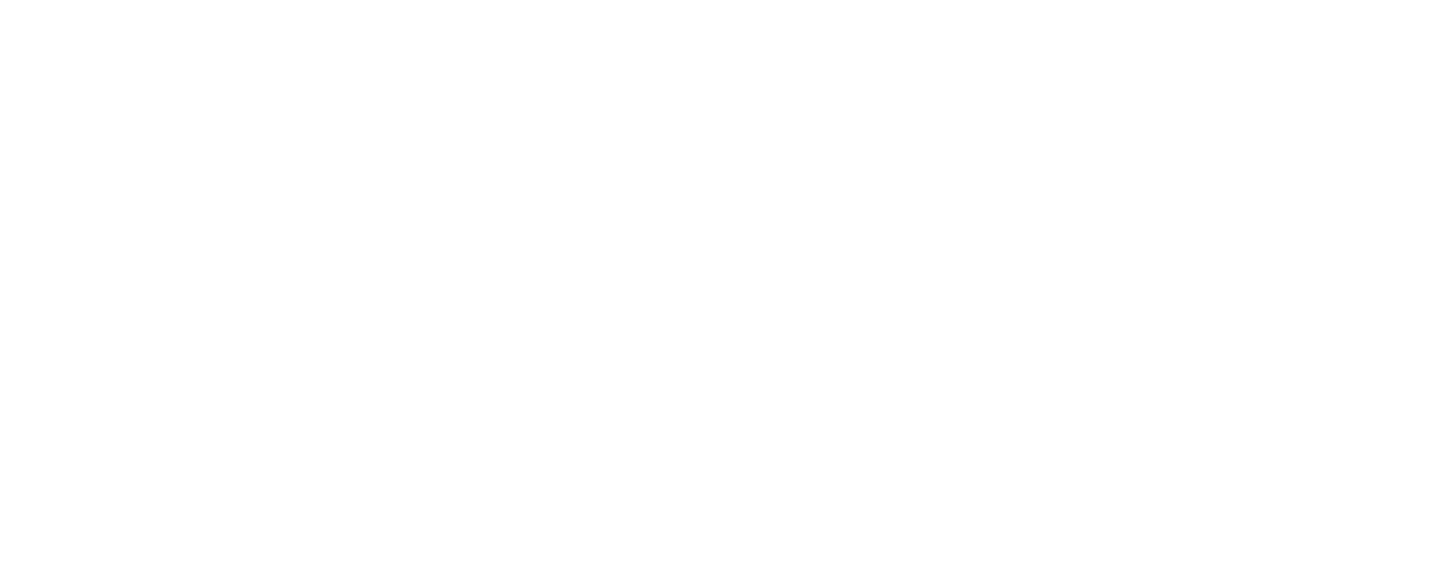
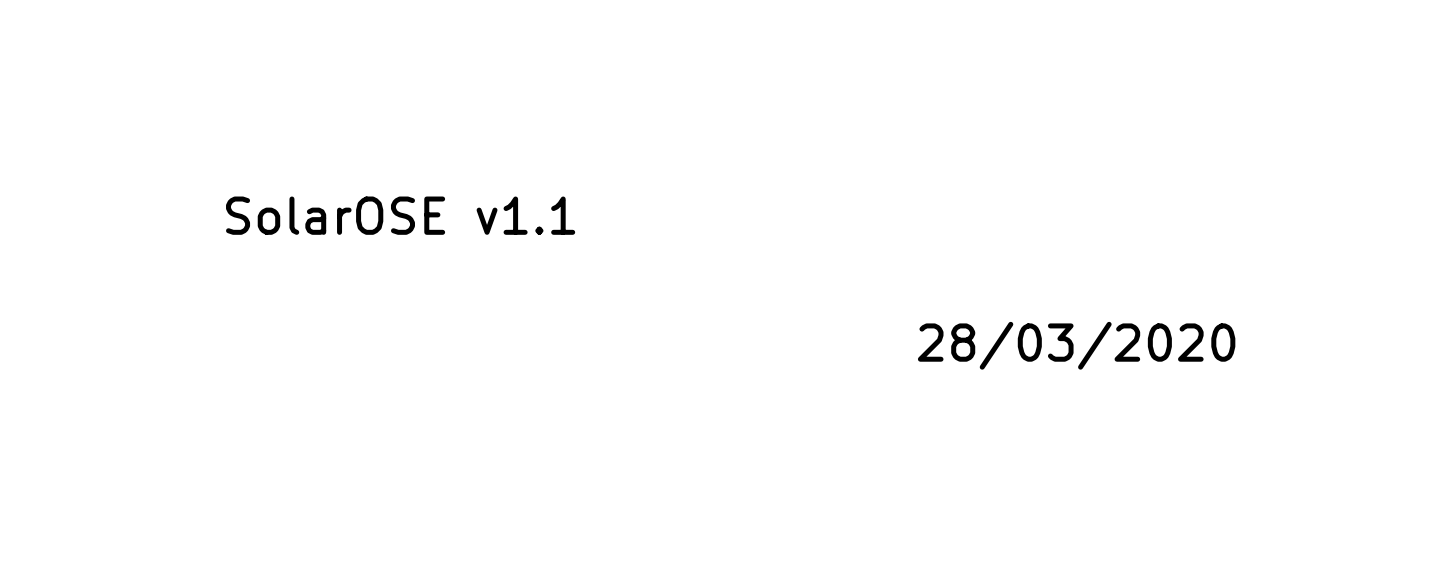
text: none -> SolarOSE v1.1 (400, 215)
text: none -> 28/03/2020 (1076, 345)

